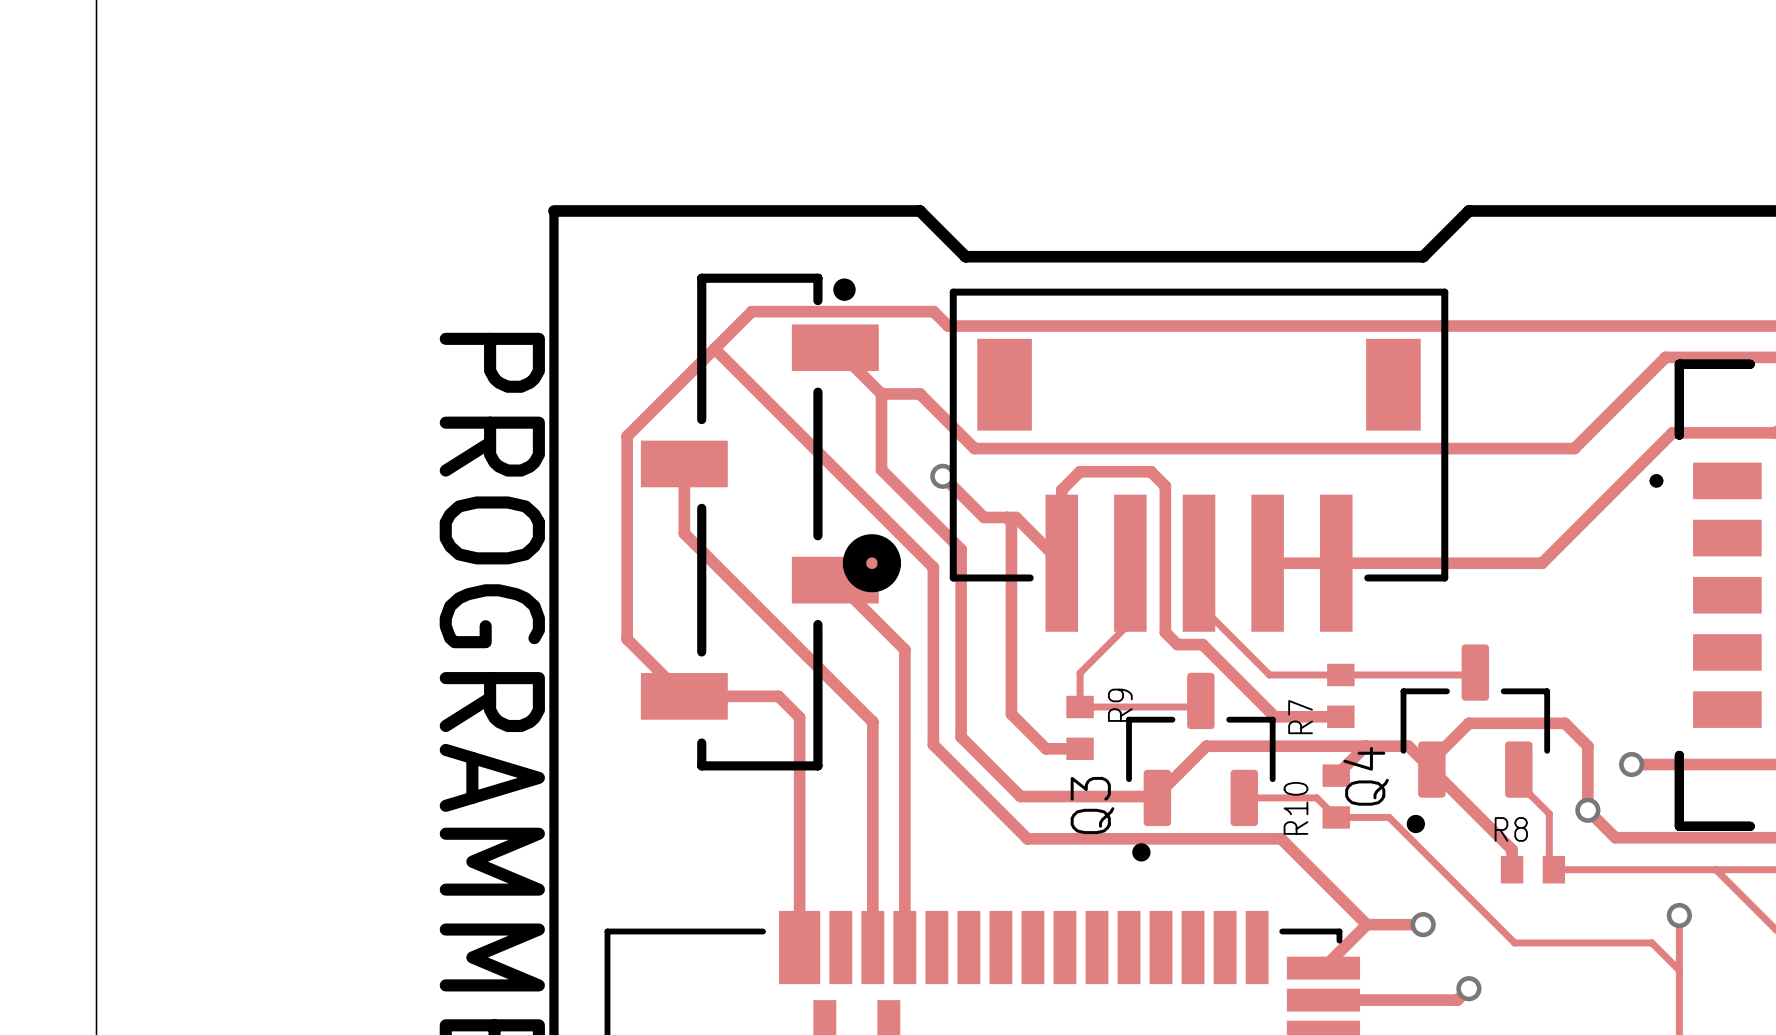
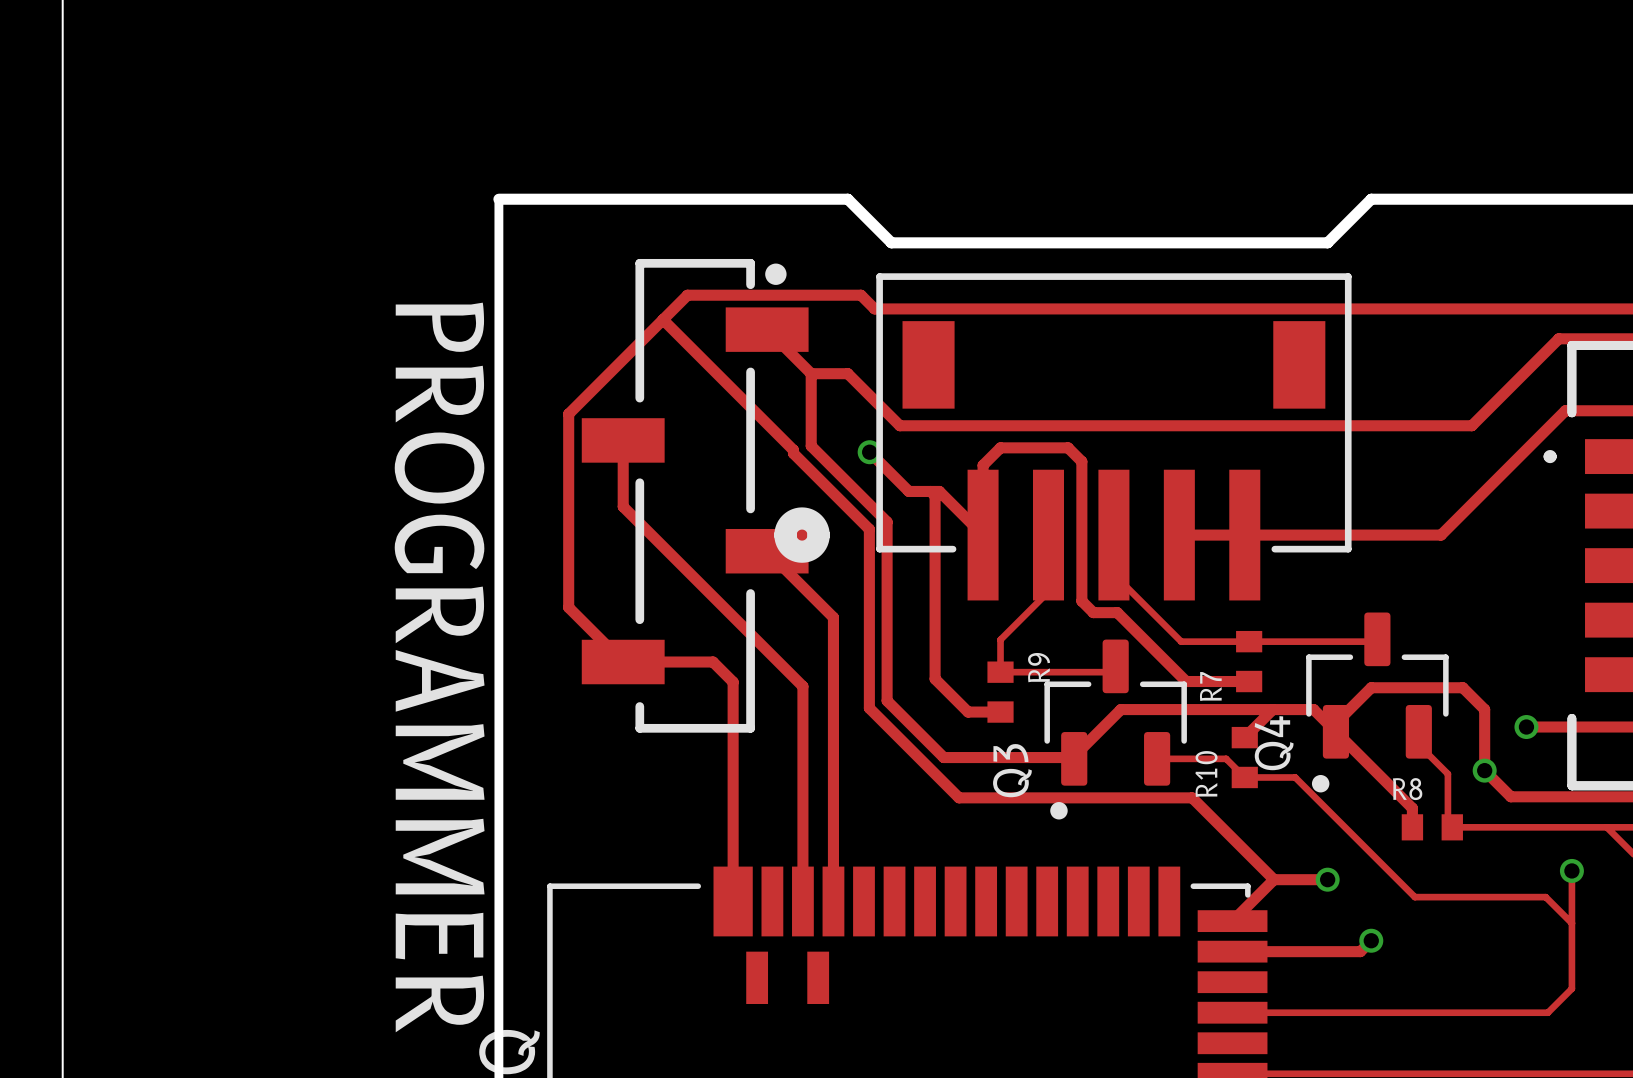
track: (714, 348) (933, 567) (933, 744) (1027, 838) (1036, 838) -> (663, 319) (869, 529) (869, 708) (959, 797)

